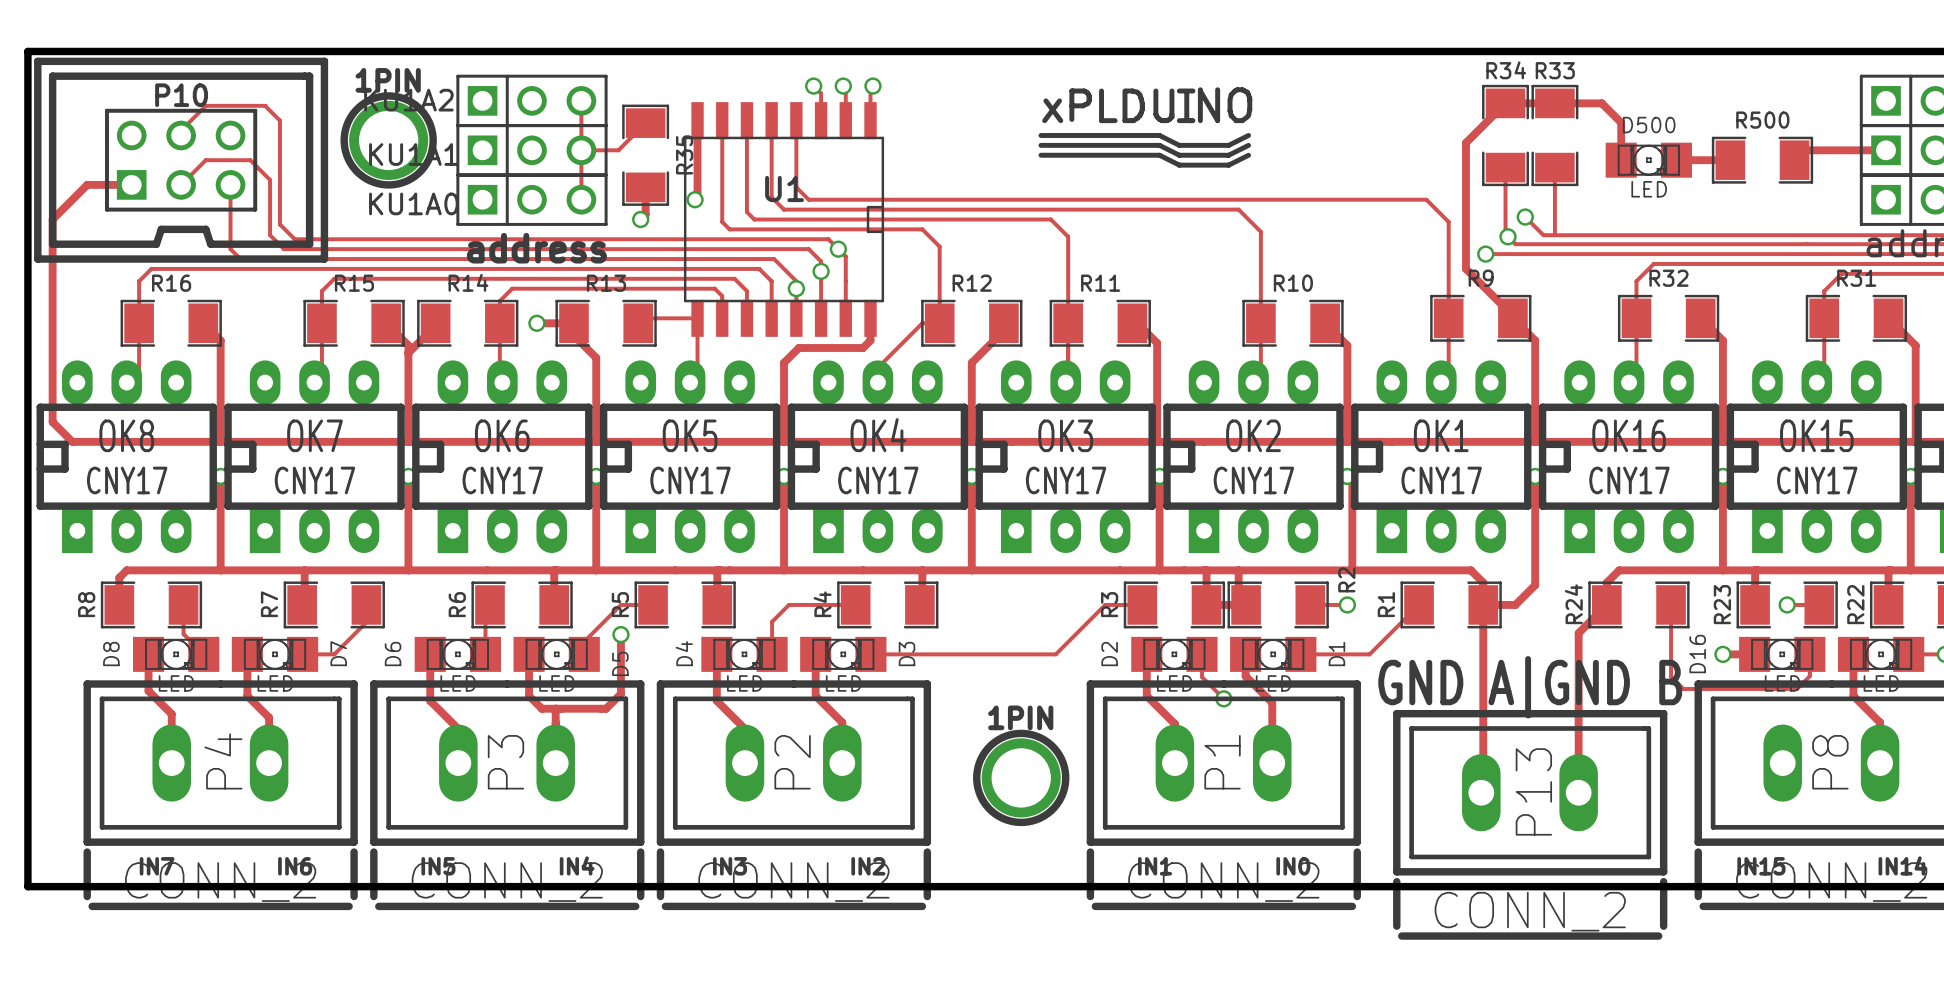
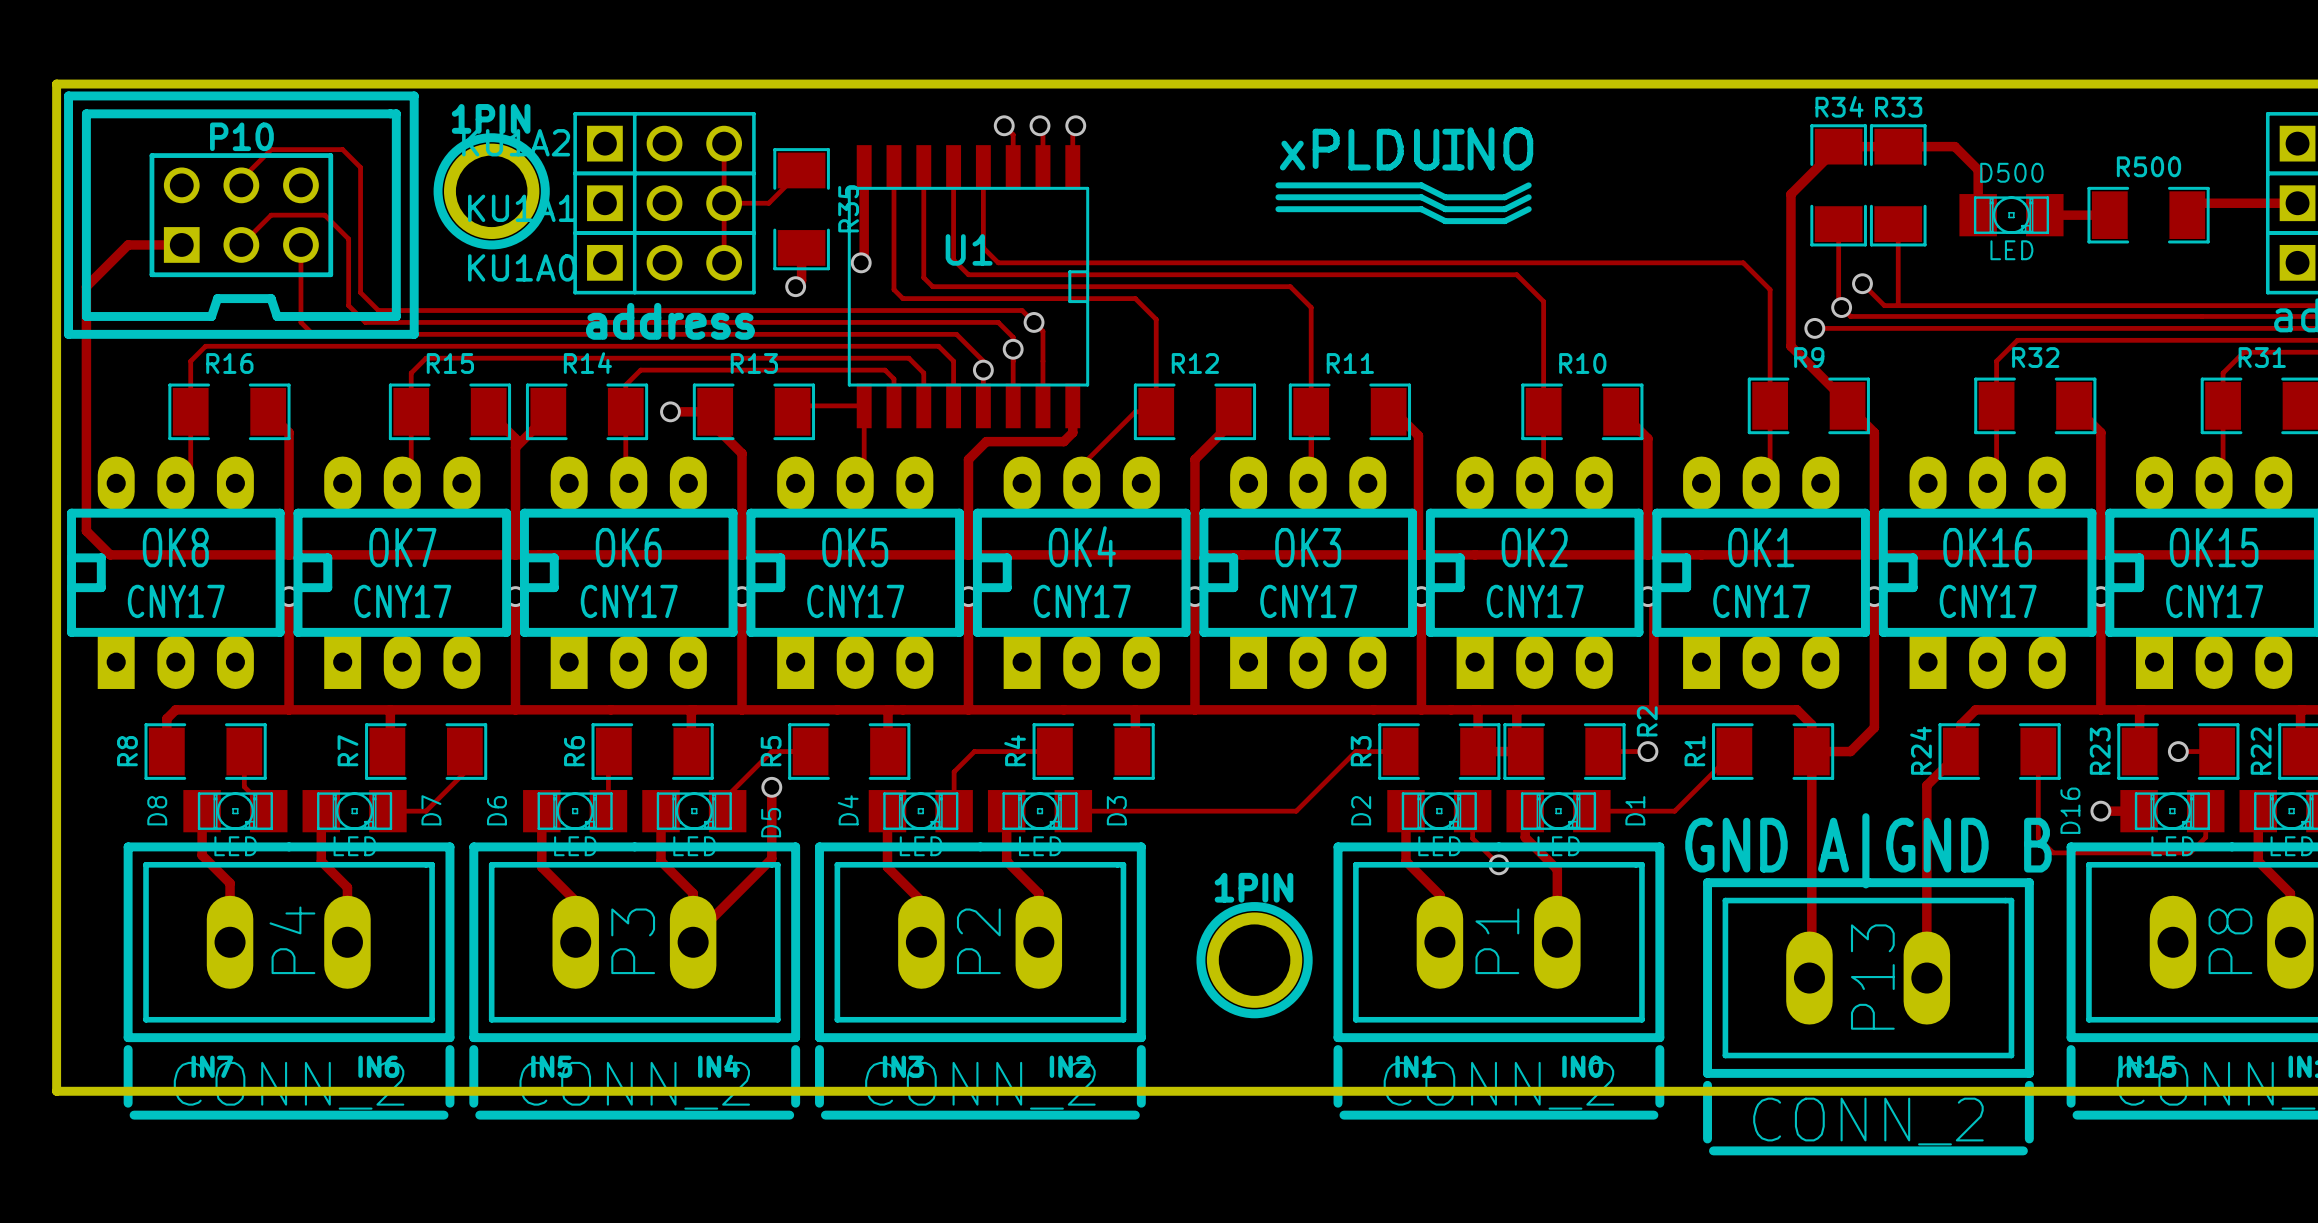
track: (541, 708) (606, 708) -> (693, 937) (753, 876)
track: (555, 708) (555, 722) -> (676, 876) (693, 893)

